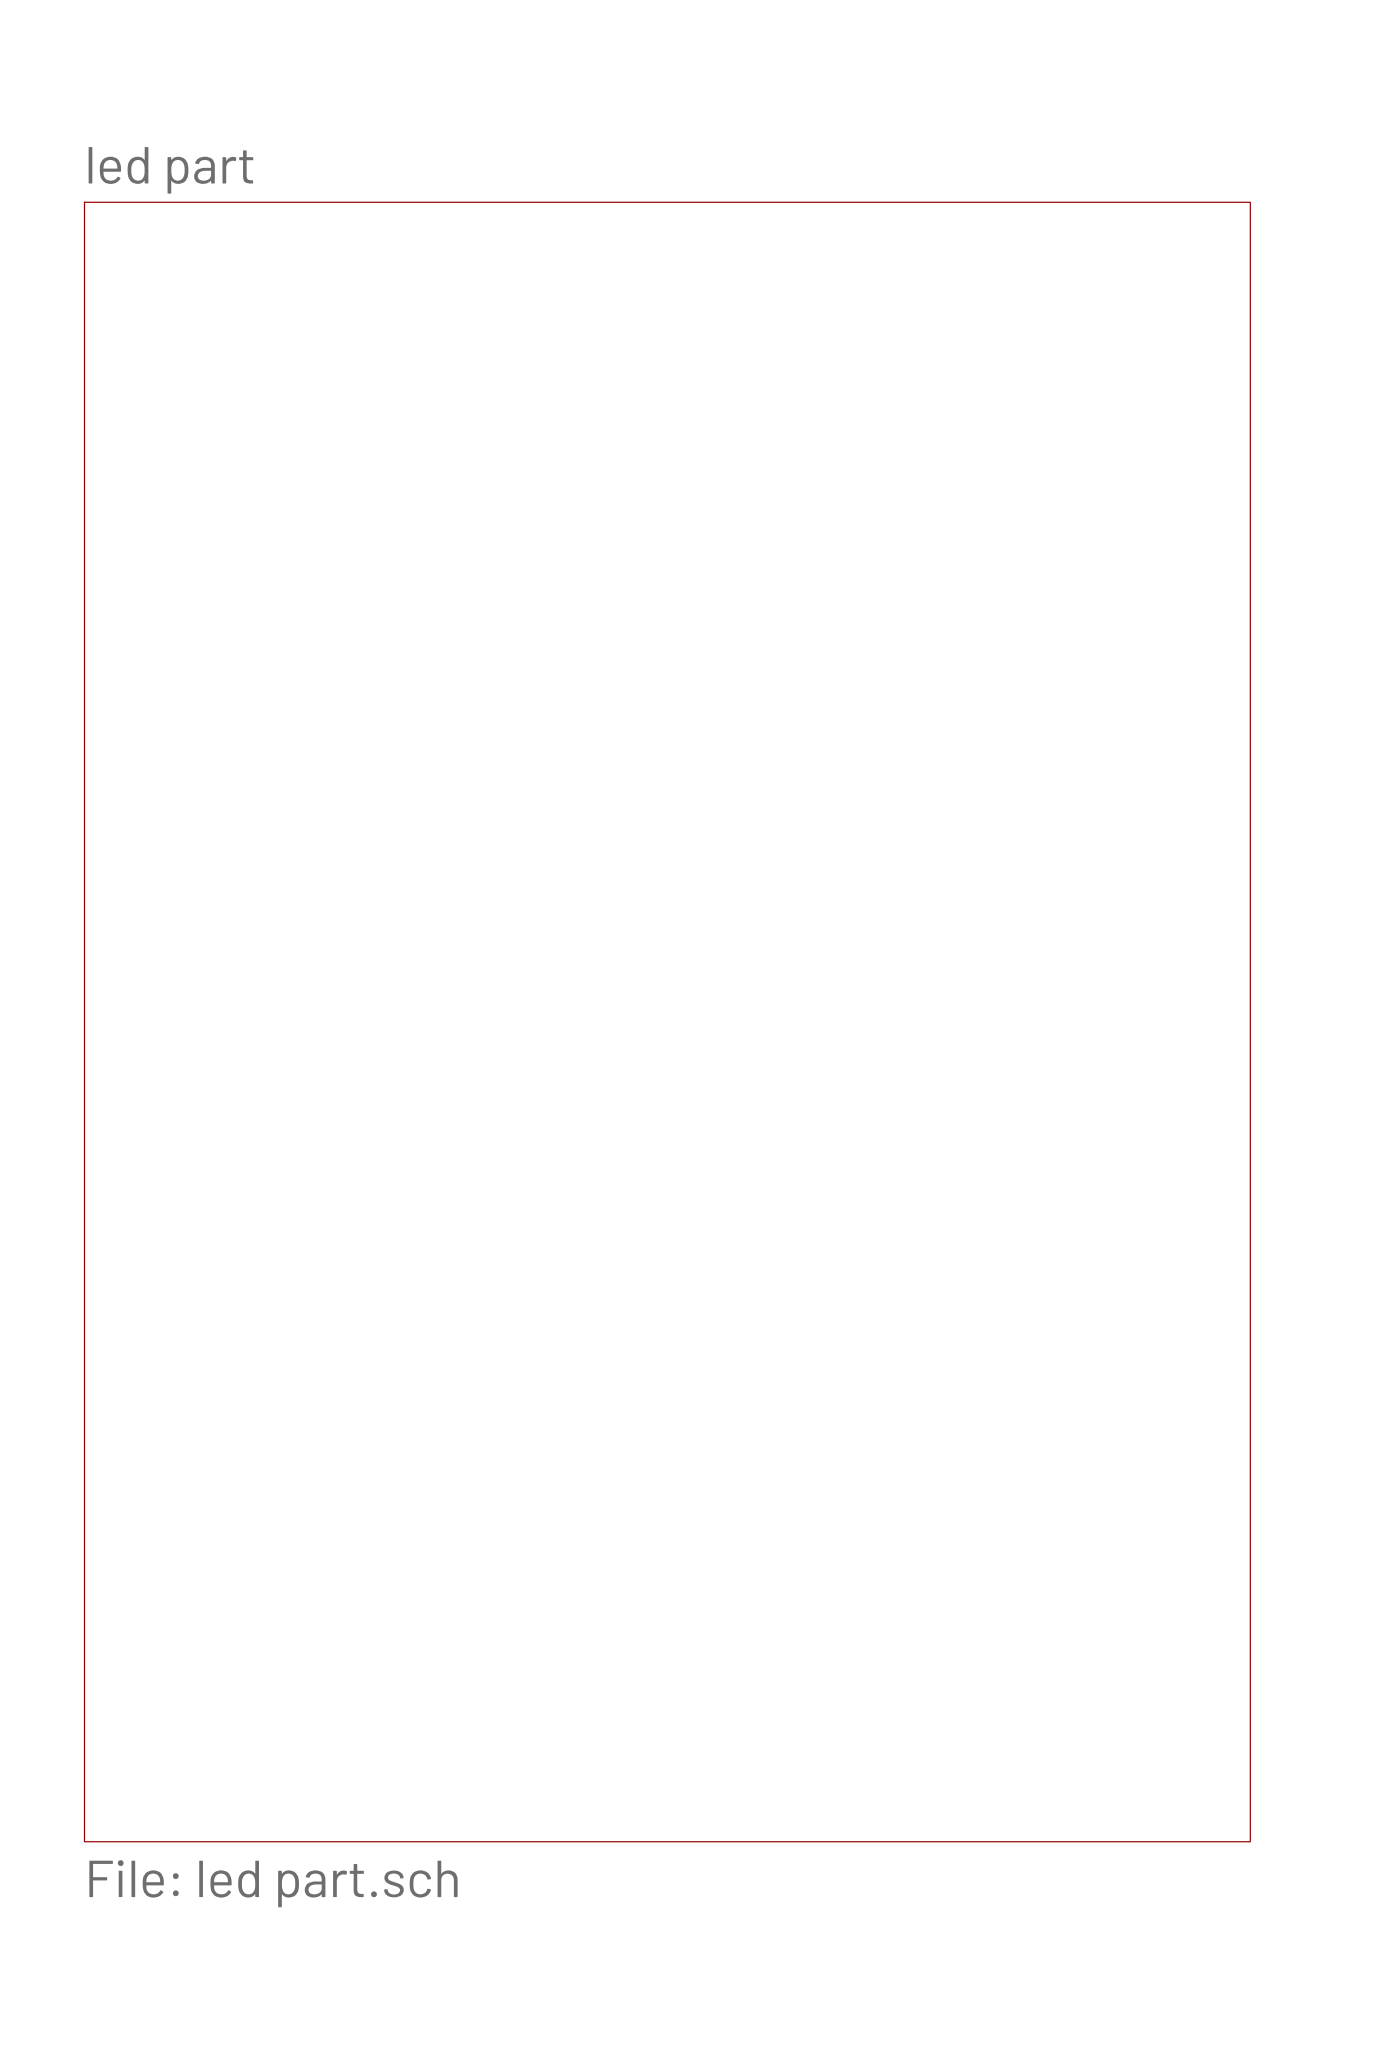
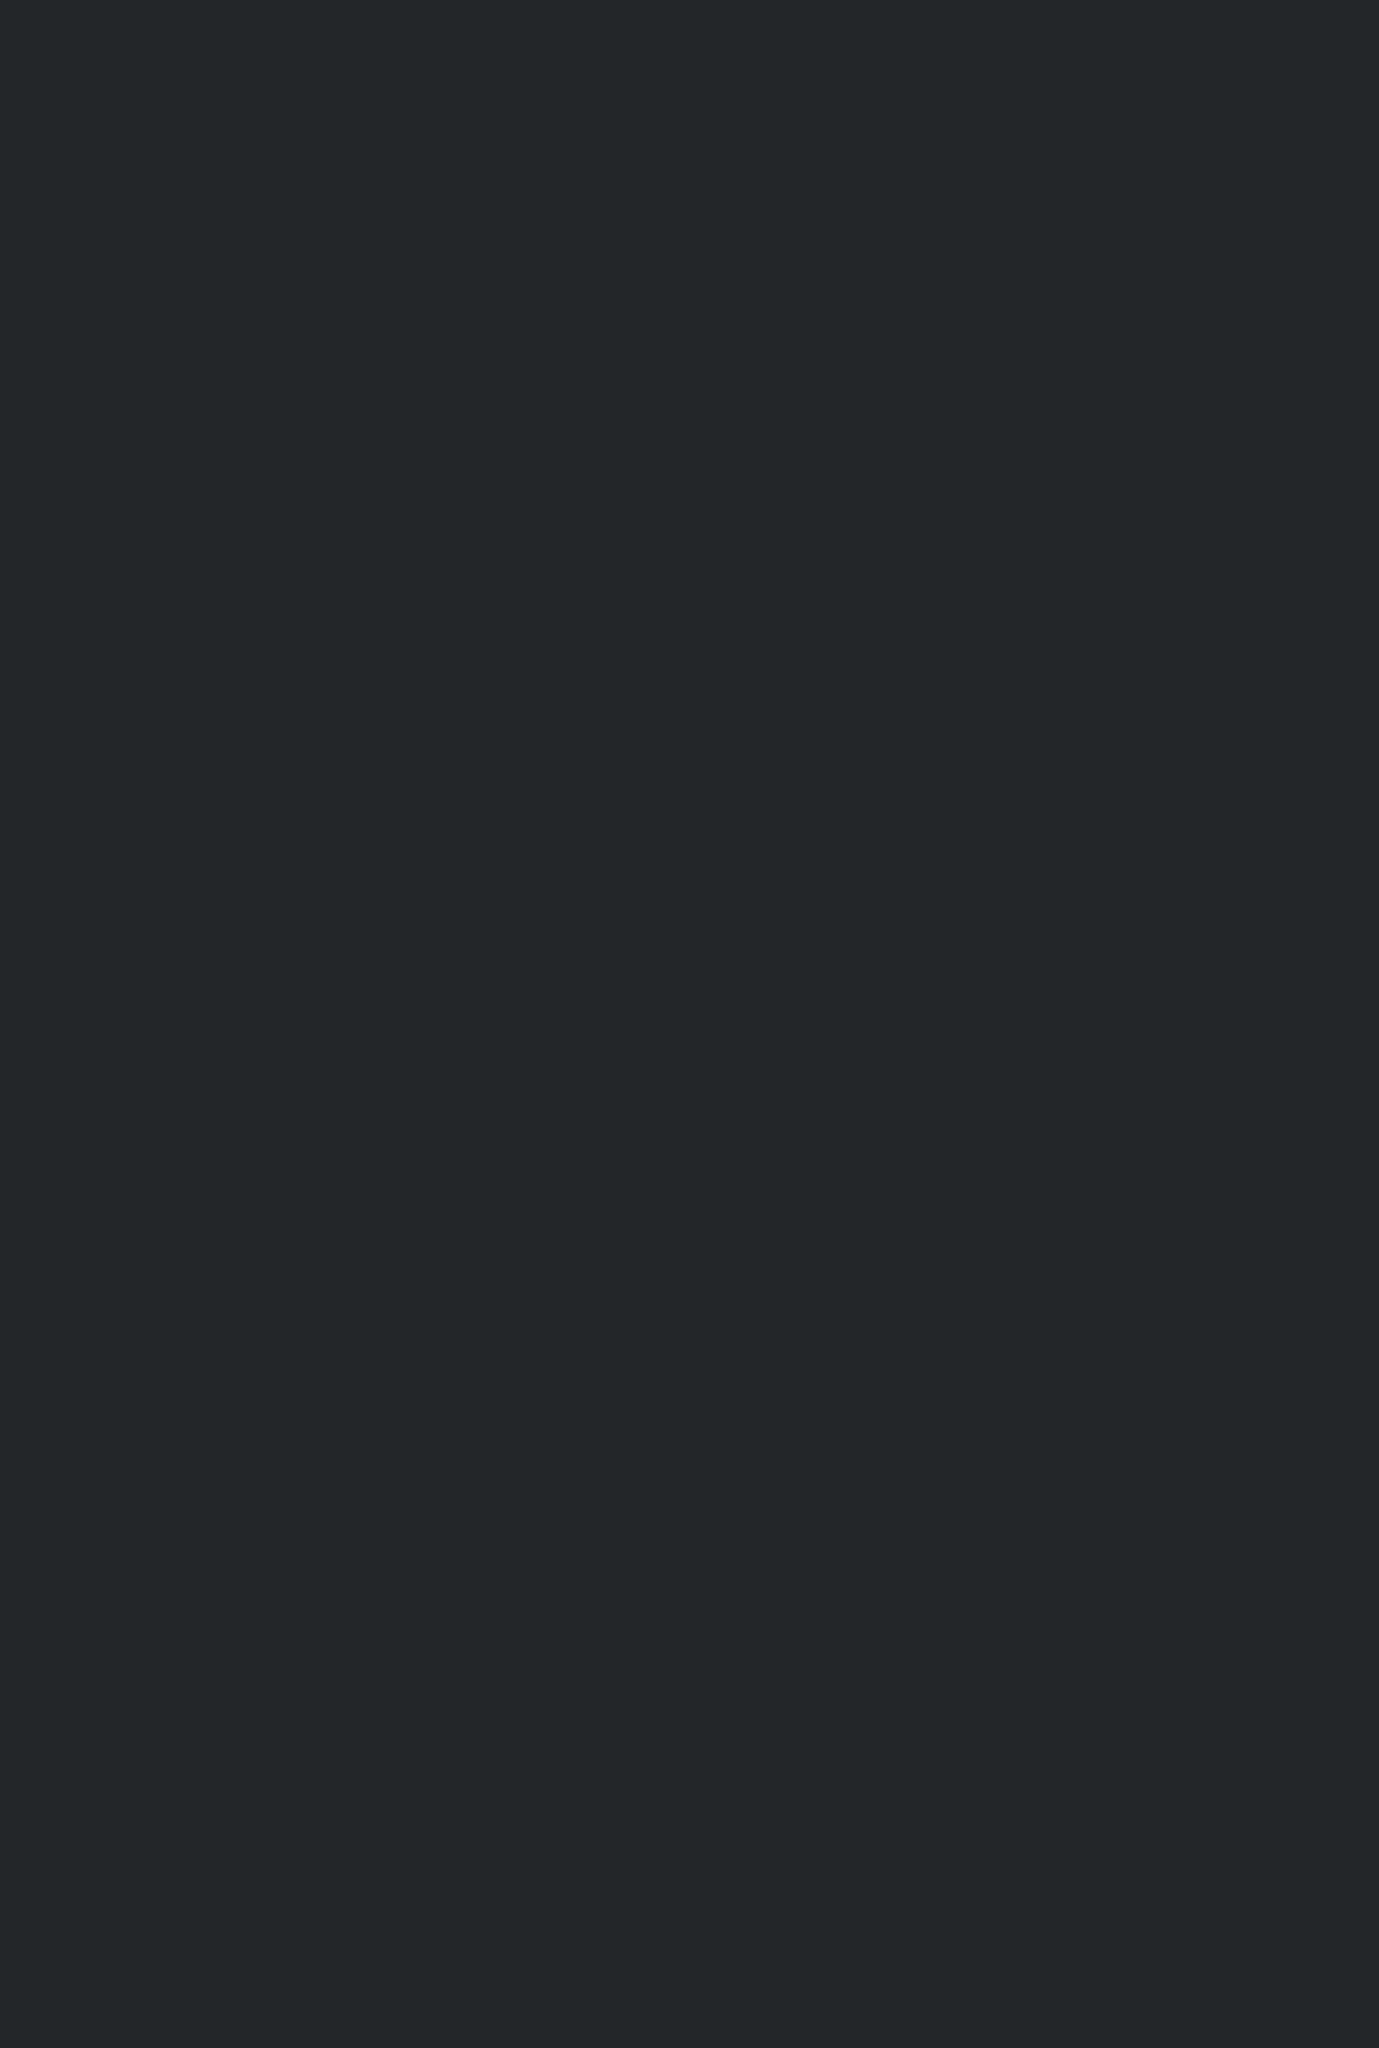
sheet led part: File: led part.sch (667, 1022) -> none

